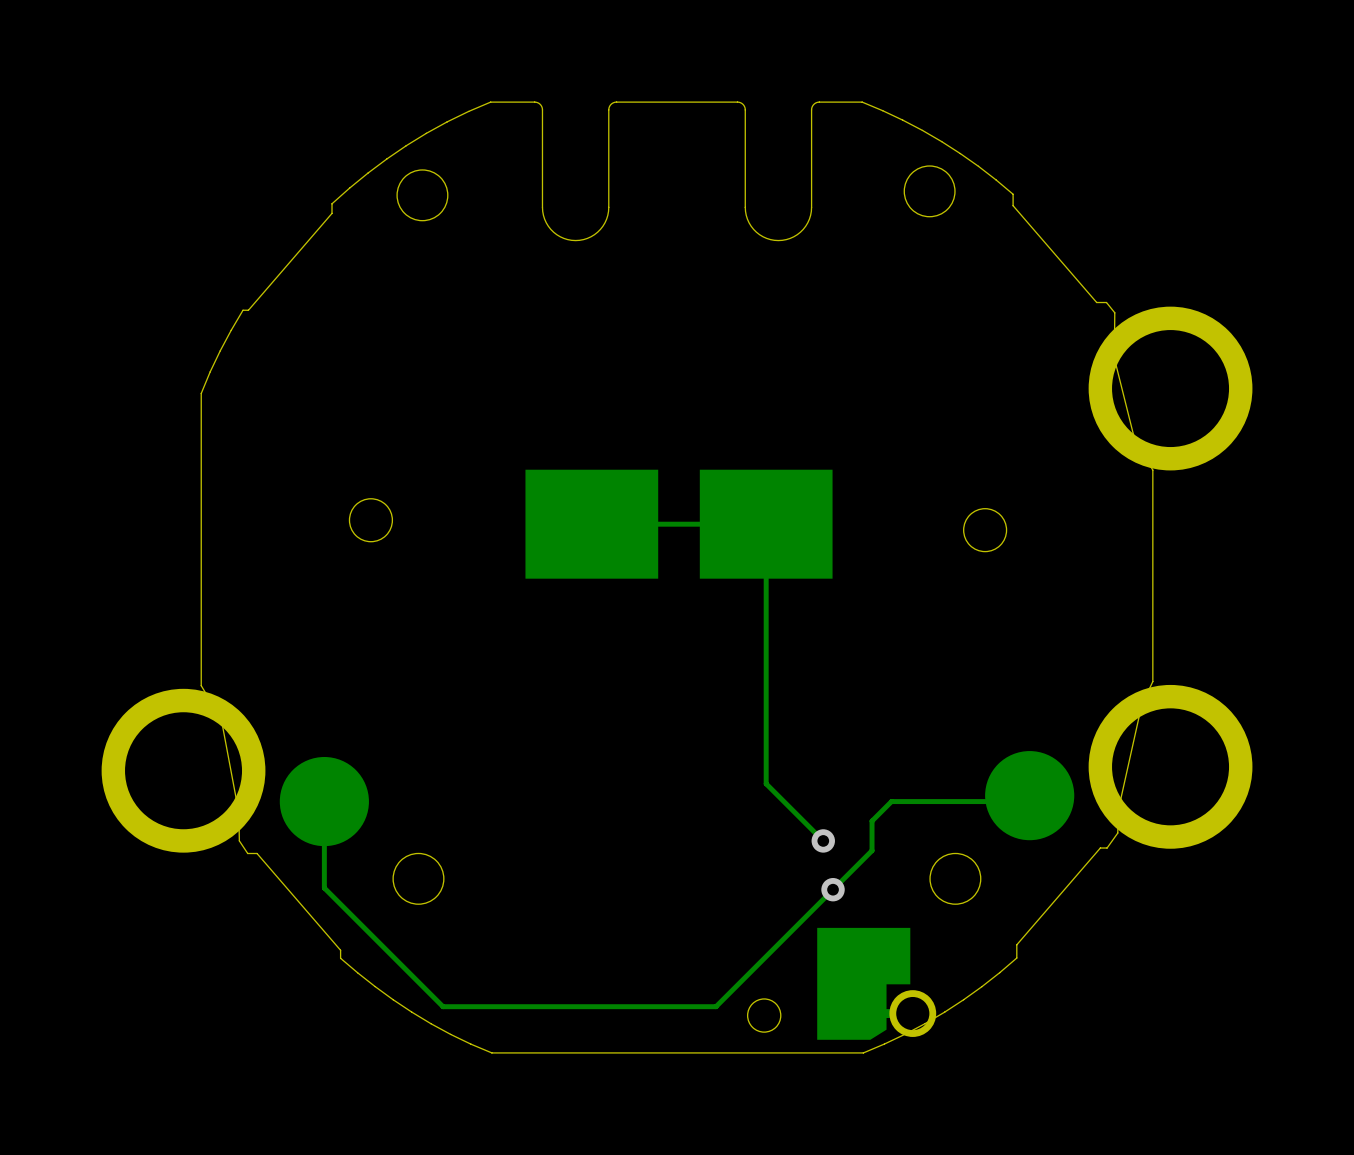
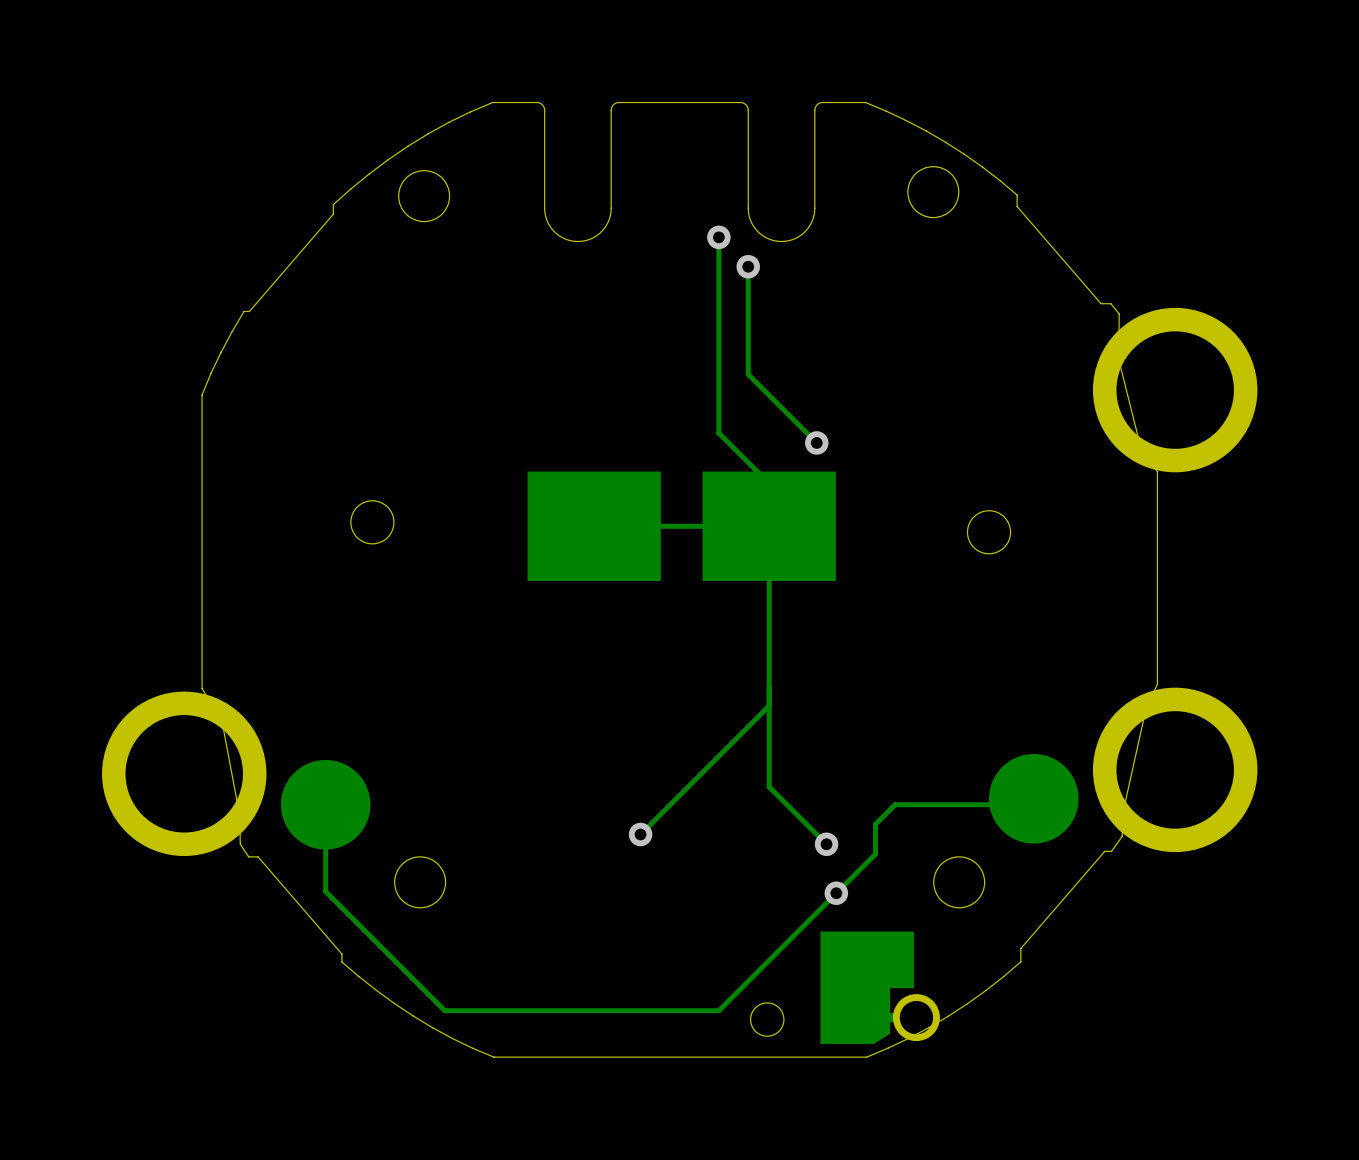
track: none -> (718, 237) (718, 433) (769, 483) (769, 526)
via: none -> (718, 237)
track: none -> (748, 266) (748, 374) (816, 442)
via: none -> (748, 266)
via: none -> (816, 442)
track: none -> (769, 705) (640, 834)
via: none -> (640, 834)

